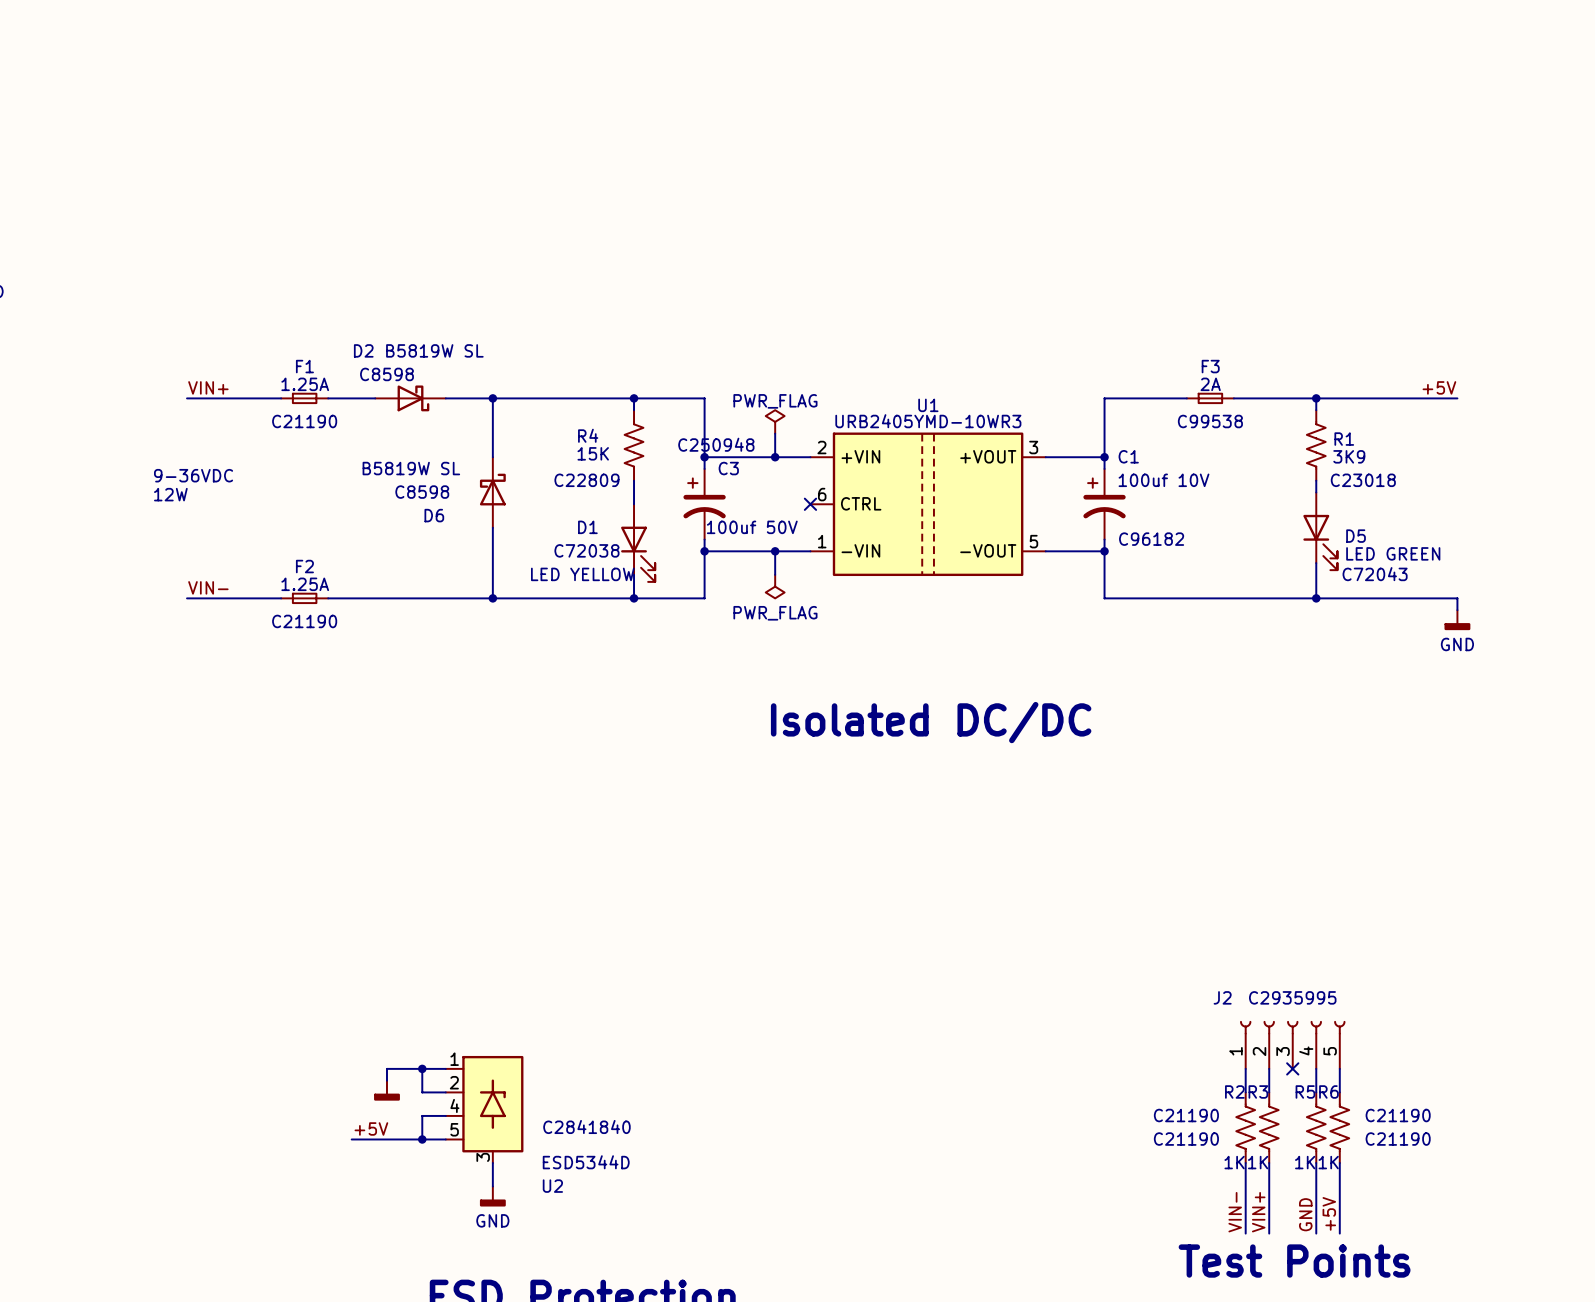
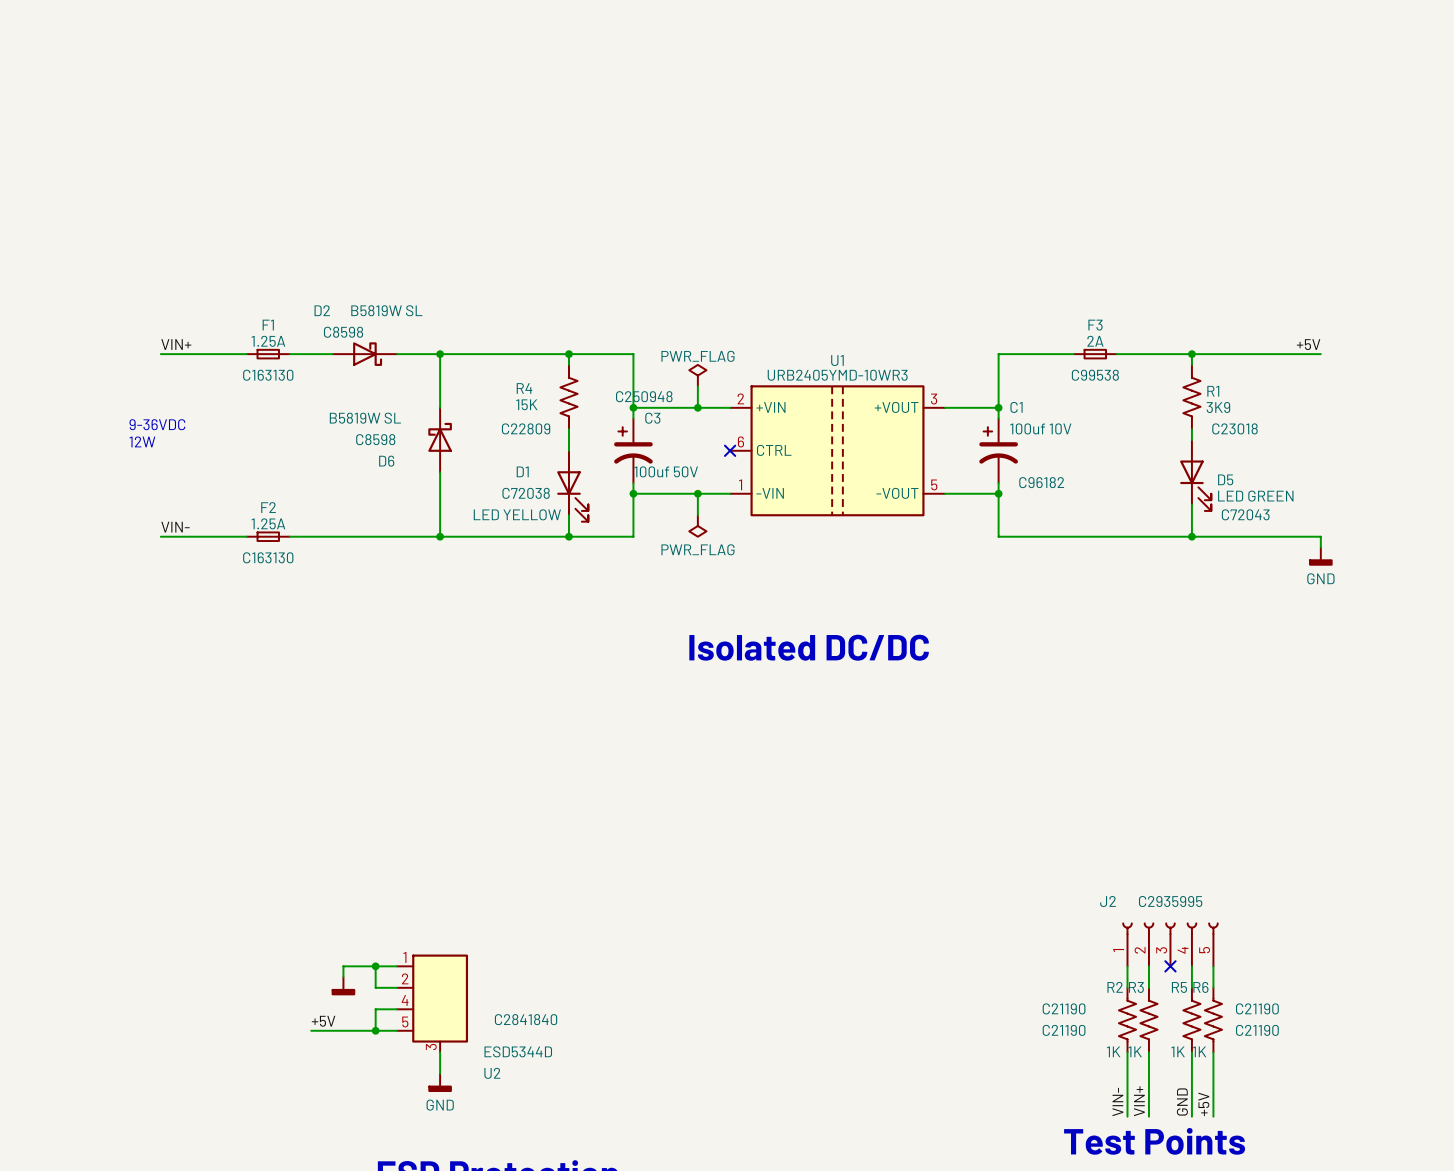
F1 text: C21190 (304, 421) -> C163130 (268, 375)
F2 text: C21190 (304, 621) -> C163130 (268, 557)
U2 symbol: [445, 1055, 524, 1164] -> [397, 954, 469, 1053]

